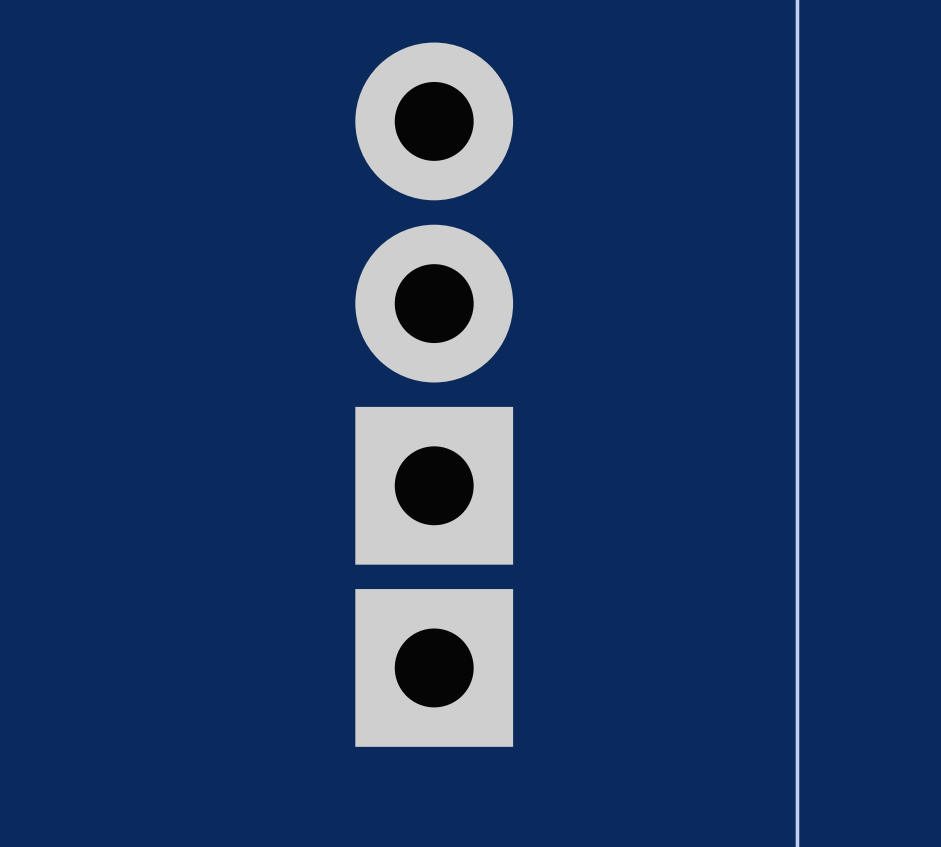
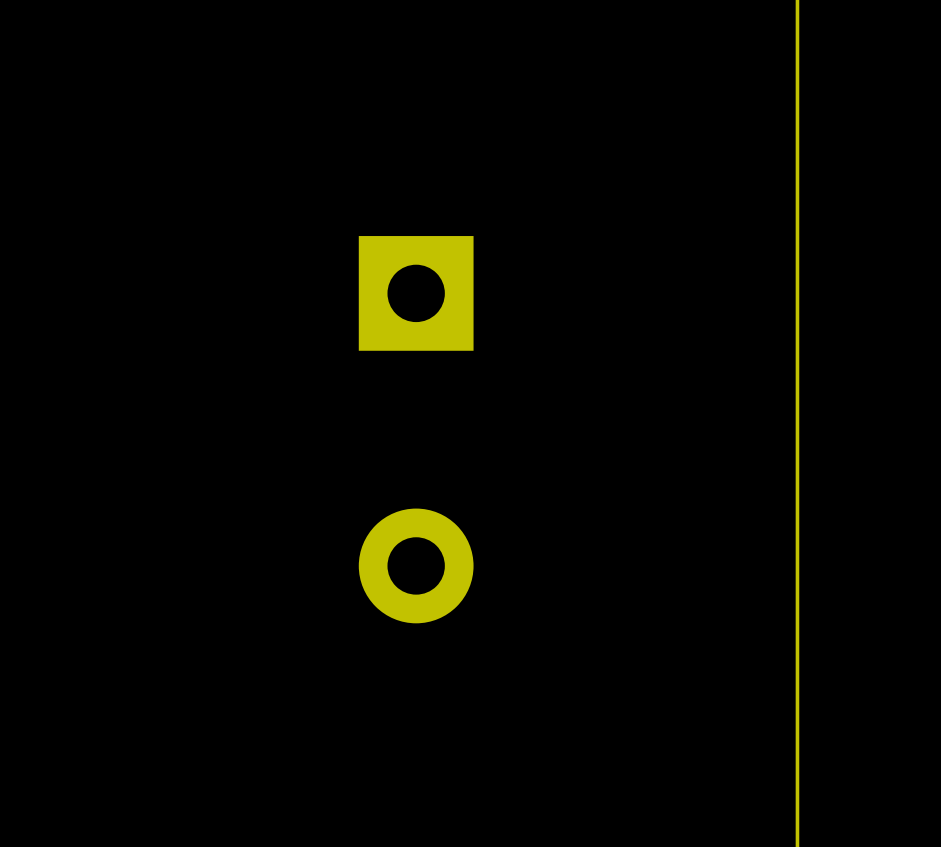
part footprint: [355, 42, 514, 747] -> [358, 236, 474, 624]

